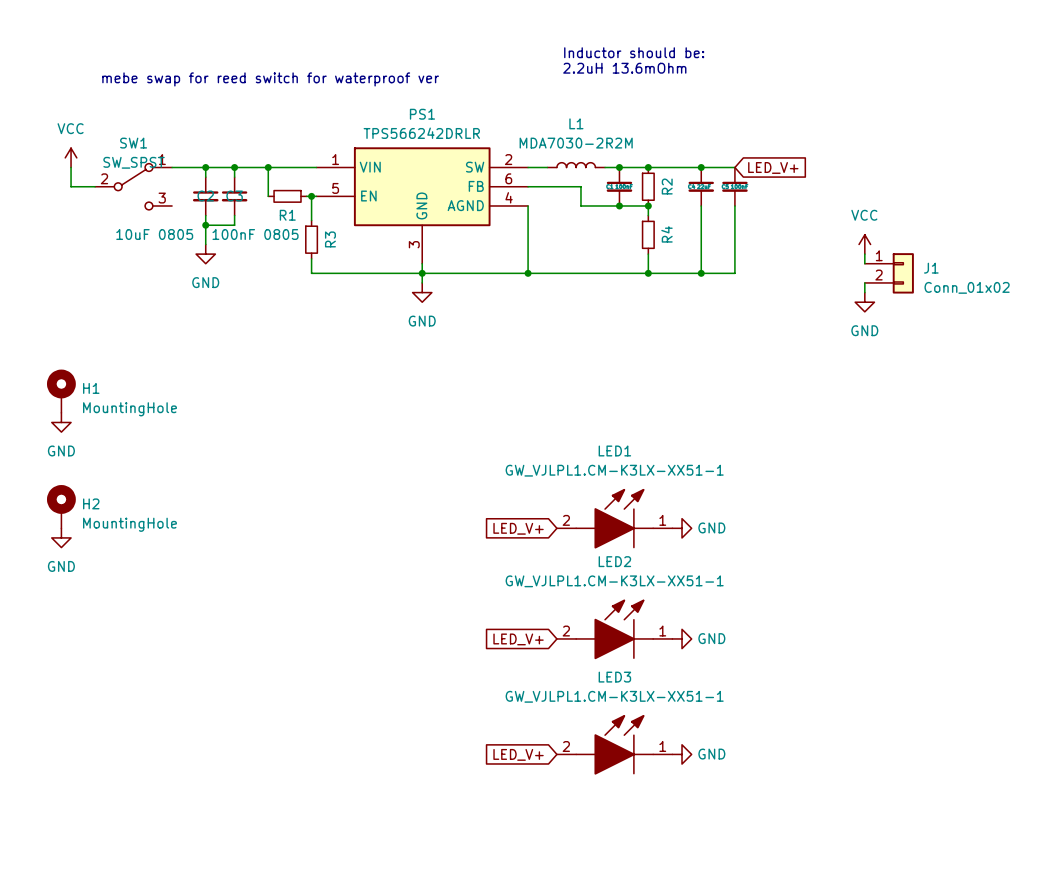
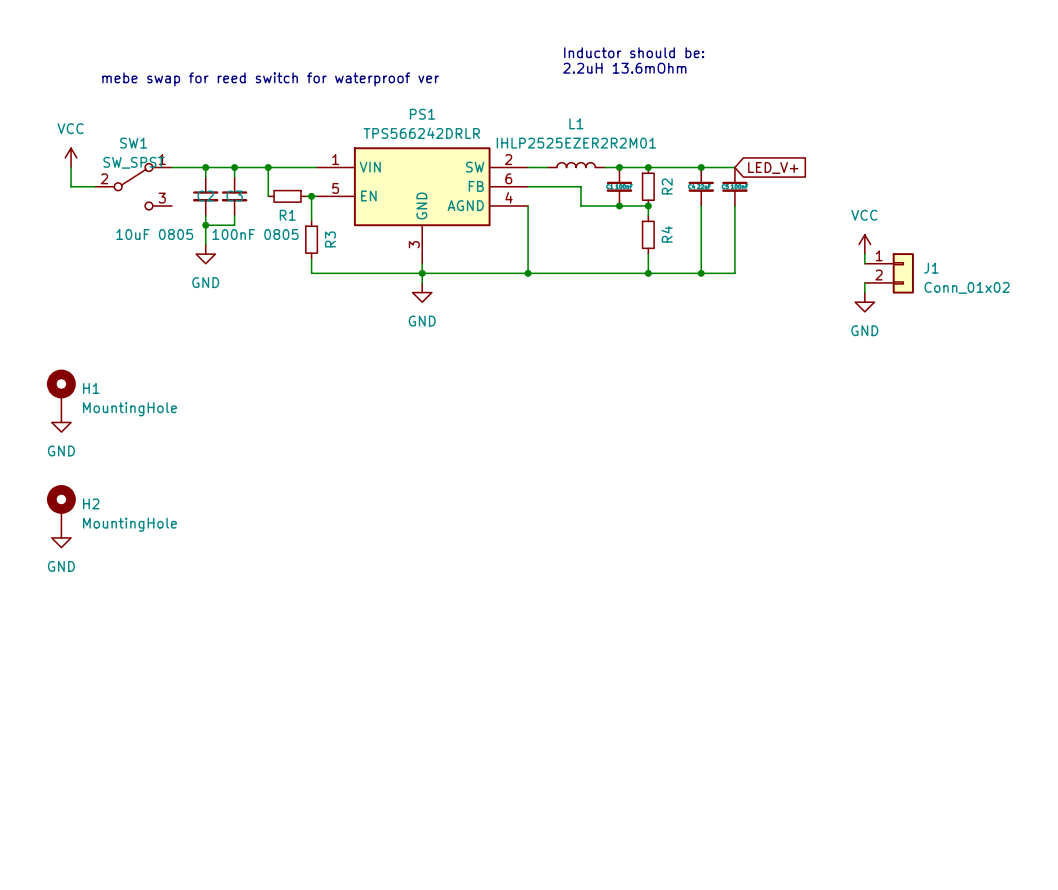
L1 value: MDA7030-2R2M (576, 143) -> IHLP2525EZER2R2M01 (576, 143)
LED1: GW_VJLPL1.CM-K3LX-XX51-1 (614, 518) -> none
global label: LED_V+ (518, 528) -> none
power symbol: GND (682, 528) -> none
LED2: GW_VJLPL1.CM-K3LX-XX51-1 (614, 629) -> none
power symbol: GND (682, 638) -> none
global label: LED_V+ (518, 639) -> none
LED3: GW_VJLPL1.CM-K3LX-XX51-1 (614, 744) -> none
global label: LED_V+ (518, 754) -> none
power symbol: GND (682, 754) -> none

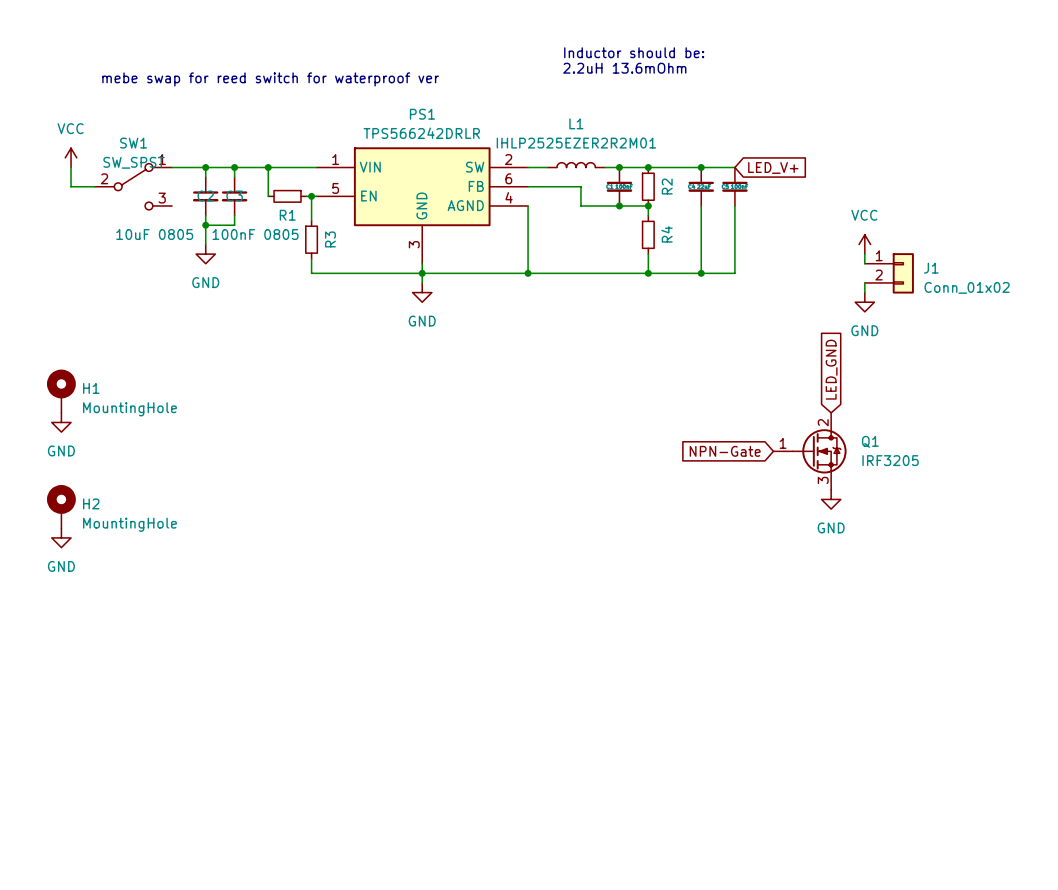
global label: none -> LED_GND (831, 369)
global label: none -> NPN-Gate (725, 451)
Q1: none -> IRF3205 (809, 451)
power symbol: none -> GND (831, 499)

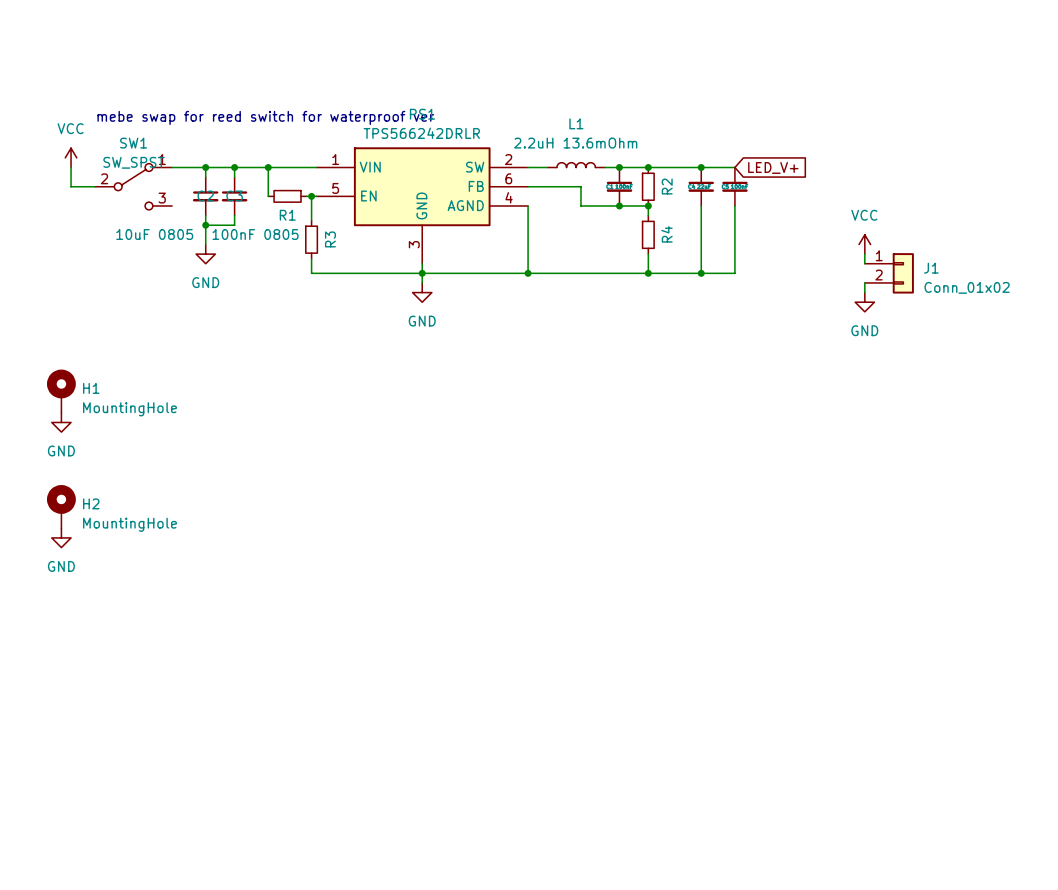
text: Inductor should be: (634, 52) -> none
text: 2.2uH 13.6mOhm (624, 68) -> none
text position: mebe swap for reed switch for waterproof ver (270, 79) -> mebe swap for reed switch for waterproof ver (265, 117)
L1 value: IHLP2525EZER2R2M01 (576, 143) -> 2.2uH 13.6mOhm (575, 143)
global label: LED_GND (831, 369) -> none
global label: NPN-Gate (725, 451) -> none
Q1: IRF3205 (809, 451) -> none
power symbol: GND (831, 499) -> none

